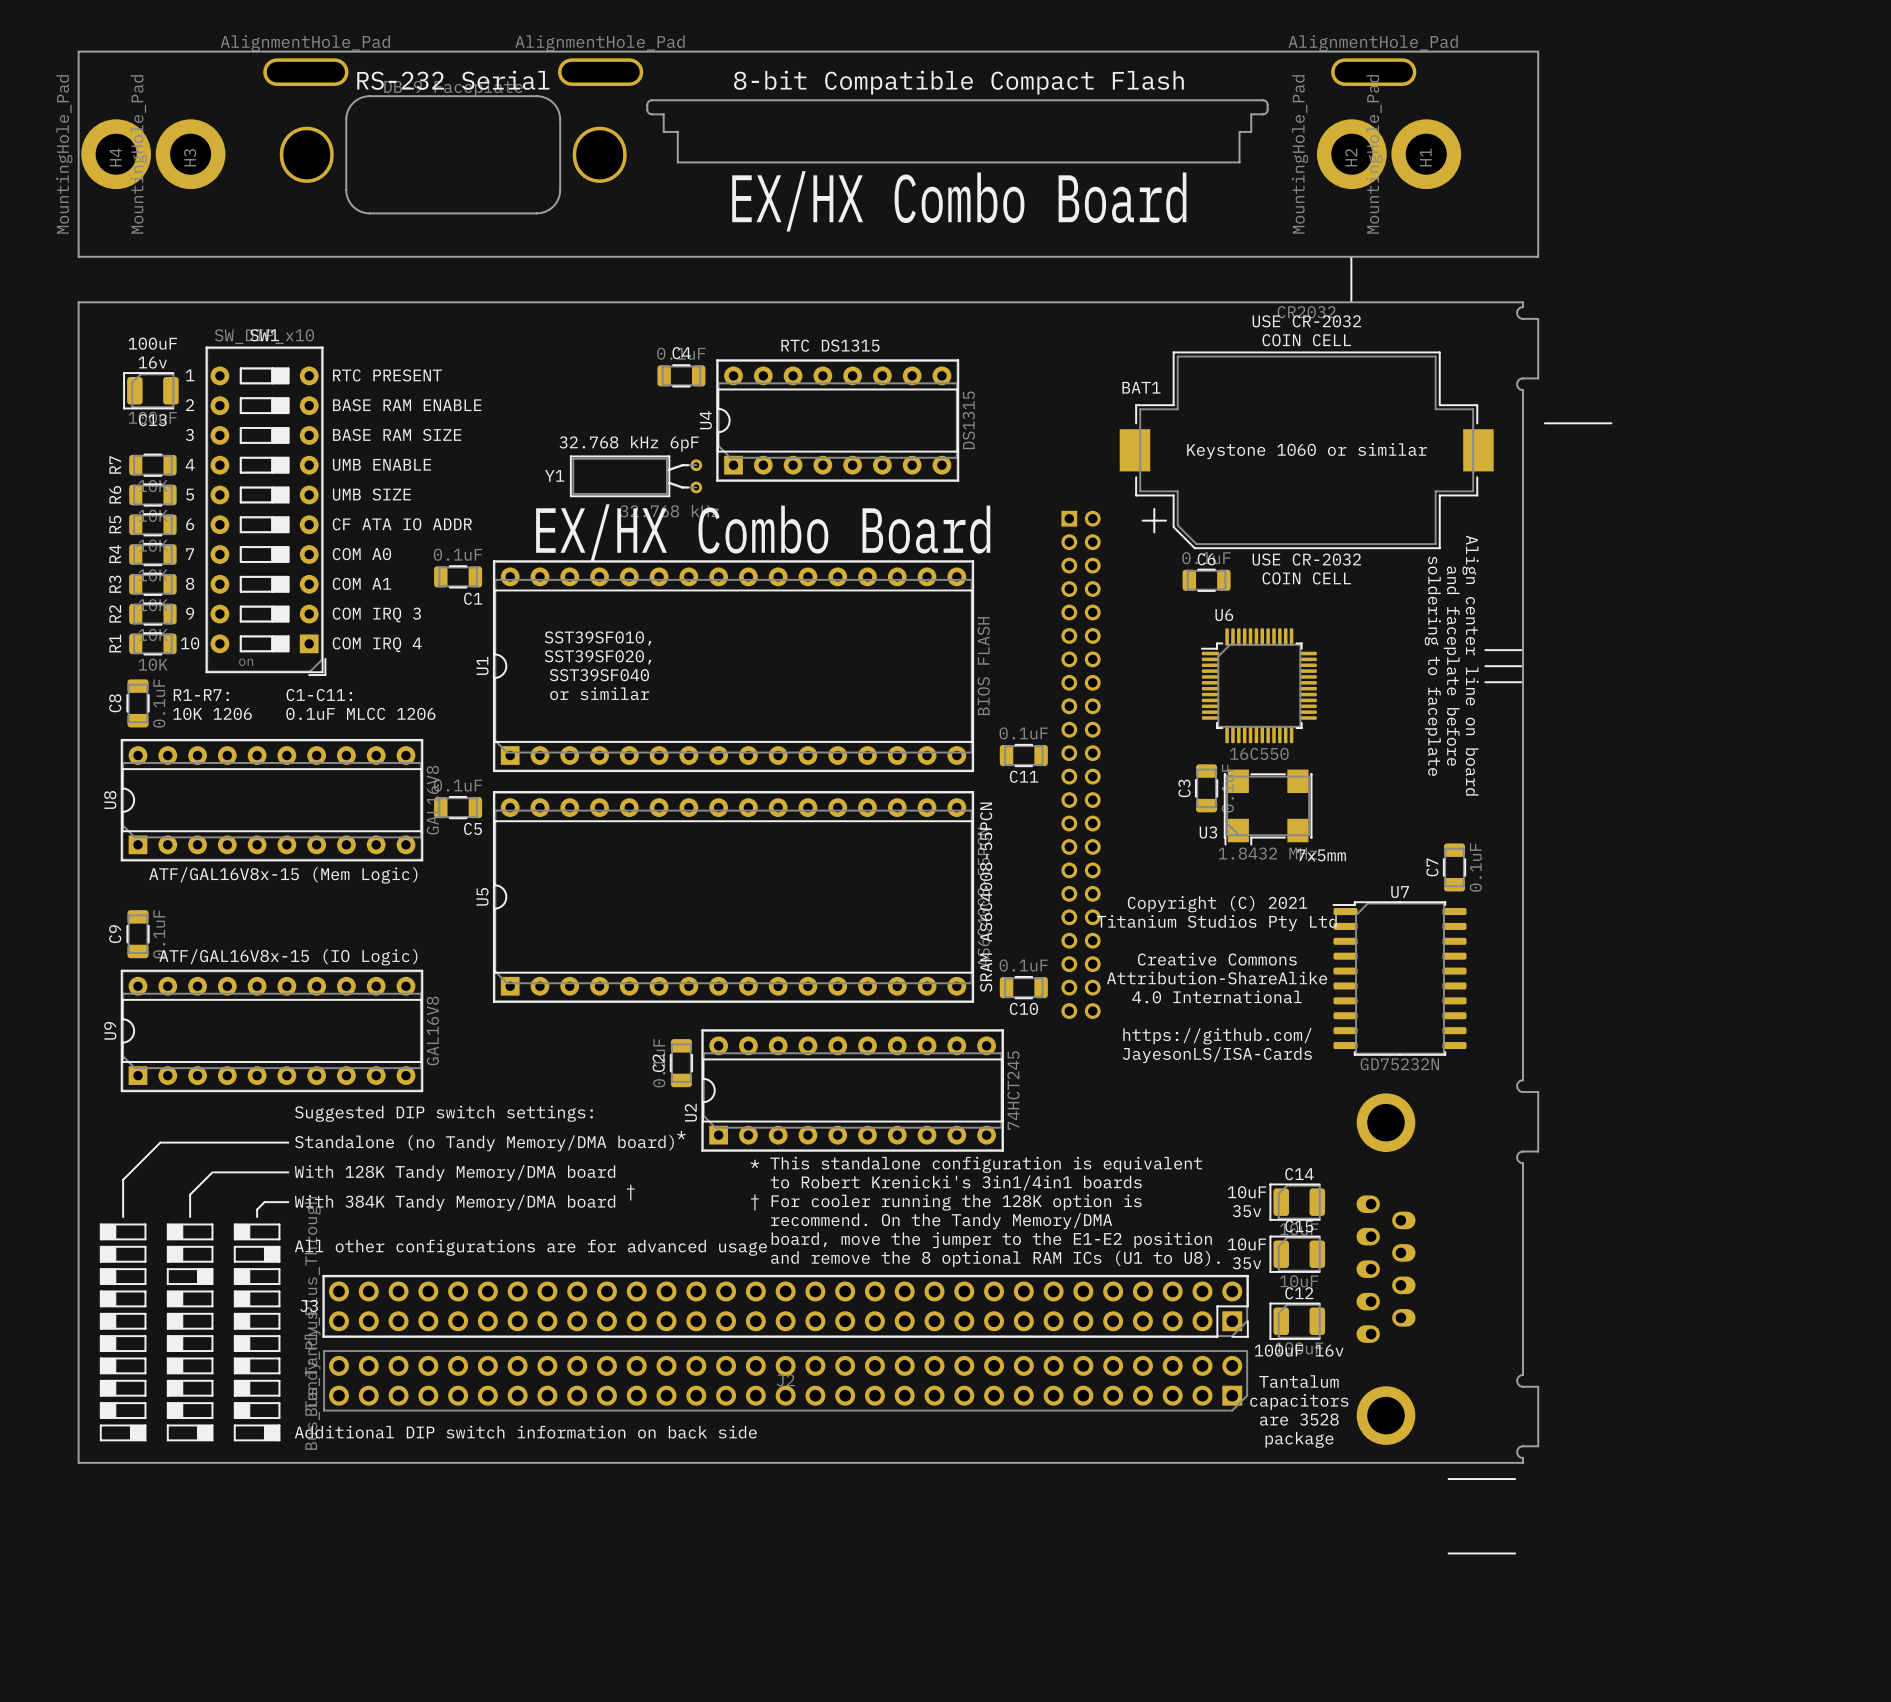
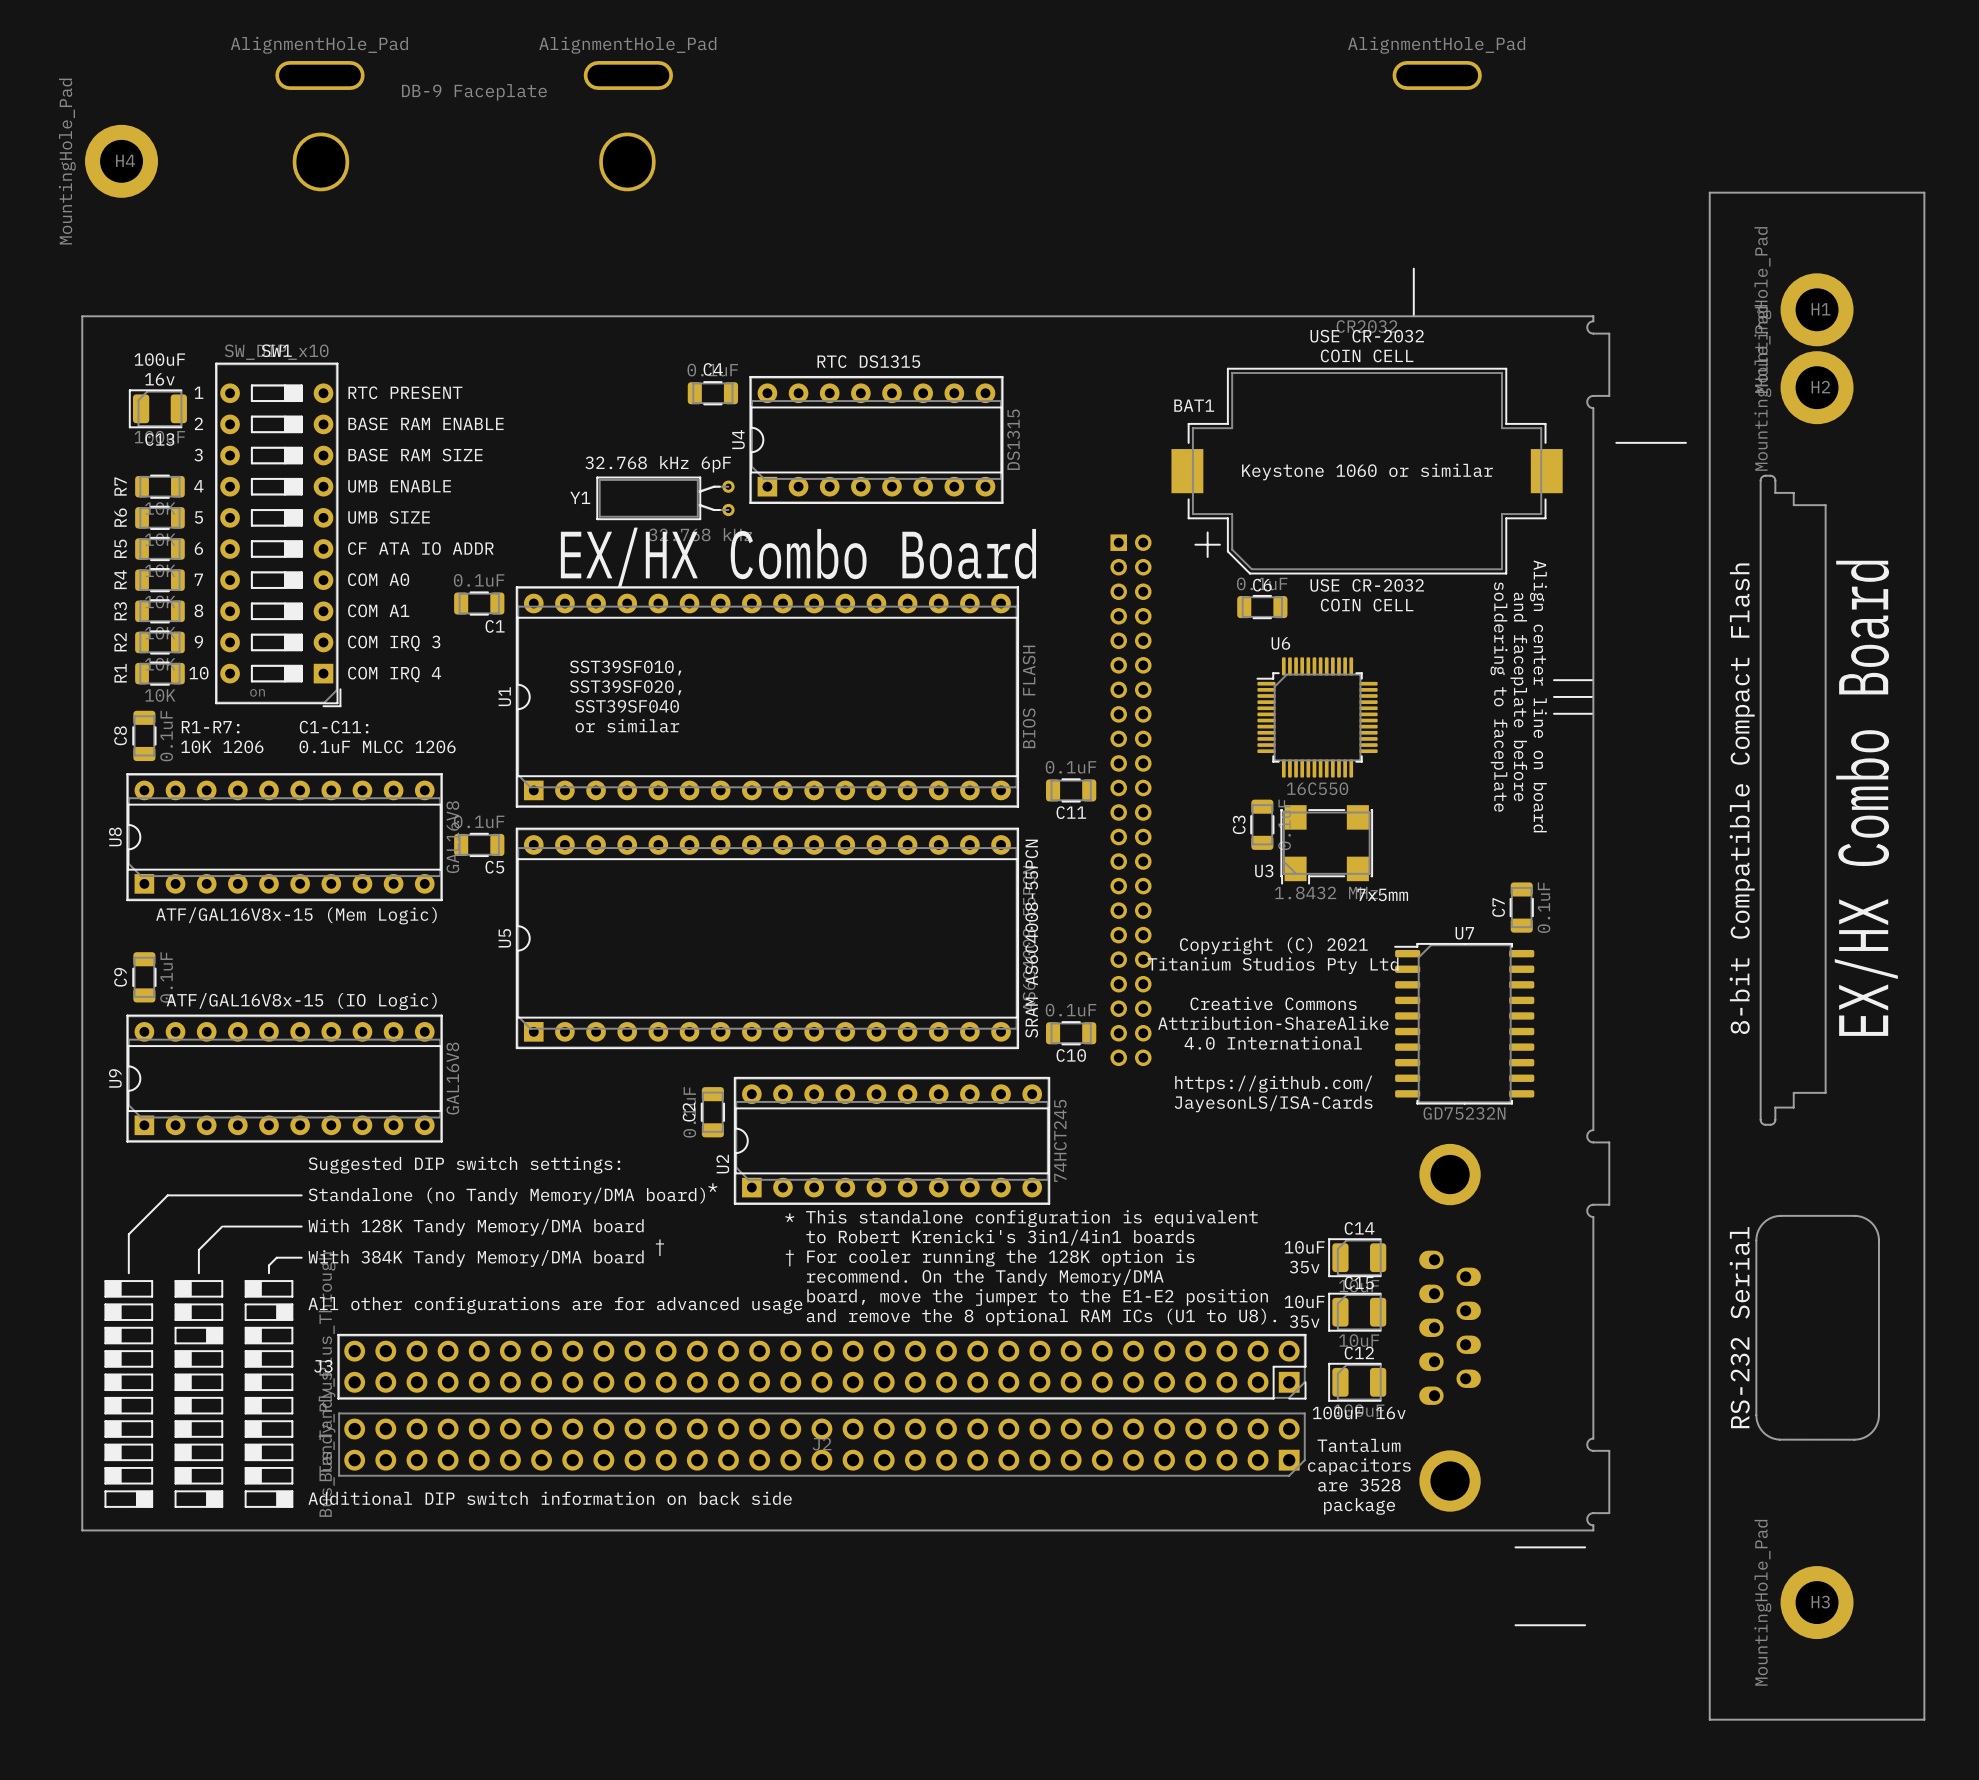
board edge: (78, 51) (1538, 51) (1538, 256) (78, 256) (78, 51) -> none
text: RS-232 Serial (453, 80) -> none
text: 8-bit Compatible Compact Flash (958, 82) -> none
board edge: (369, 96) (536, 96) (548, 99) (555, 105) (560, 116) (560, 189) (557, 201) (548, 210) (536, 213) (369, 213) (357, 210) (351, 204) (346, 193) (346, 118) (348, 109) (353, 102) (361, 97) (369, 96) -> none
board edge: (651, 114) (663, 114) (663, 131) (677, 131) (677, 162) (1239, 162) (1239, 131) (1251, 131) (1251, 114) (1265, 113) (1267, 104) (1262, 100) (651, 100) (647, 104) (647, 112) (651, 114) -> none
H3 position: (190, 154) -> (1817, 1602)
H2 position: (1351, 154) -> (1817, 387)
H1 position: (1426, 154) -> (1817, 309)
H4 name rotation: 0° (115, 157) -> 90° clockwise (125, 160)
H3 name rotation: 0° (190, 157) -> 90° clockwise (1820, 1602)
H2 name rotation: 0° (1351, 157) -> 90° clockwise (1820, 387)
H1 name rotation: 0° (1425, 157) -> 90° clockwise (1821, 309)
board edge: none -> (1709, 192) (1709, 1719) (1924, 1719) (1924, 192) (1709, 192)
text: EX/HX Combo Board (959, 201) -> none
board edge: none -> (1765, 475) (1774, 478) (1775, 492) (1793, 492) (1793, 505) (1825, 505) (1825, 1092) (1793, 1092) (1793, 1107) (1775, 1107) (1775, 1121) (1770, 1124) (1763, 1124) (1760, 1119) (1760, 480) (1765, 475)
text: none -> 8-bit Compatible Compact Flash (1742, 798)
text: none -> EX/HX Combo Board (1866, 798)
board edge: none -> (1780, 1215) (1857, 1216) (1869, 1220) (1877, 1231) (1878, 1240) (1878, 1415) (1873, 1430) (1863, 1437) (1854, 1439) (1776, 1439) (1765, 1434) (1758, 1424) (1756, 1415) (1756, 1237) (1763, 1223) (1771, 1217) (1780, 1215)
text: none -> RS-232 Serial (1739, 1327)

